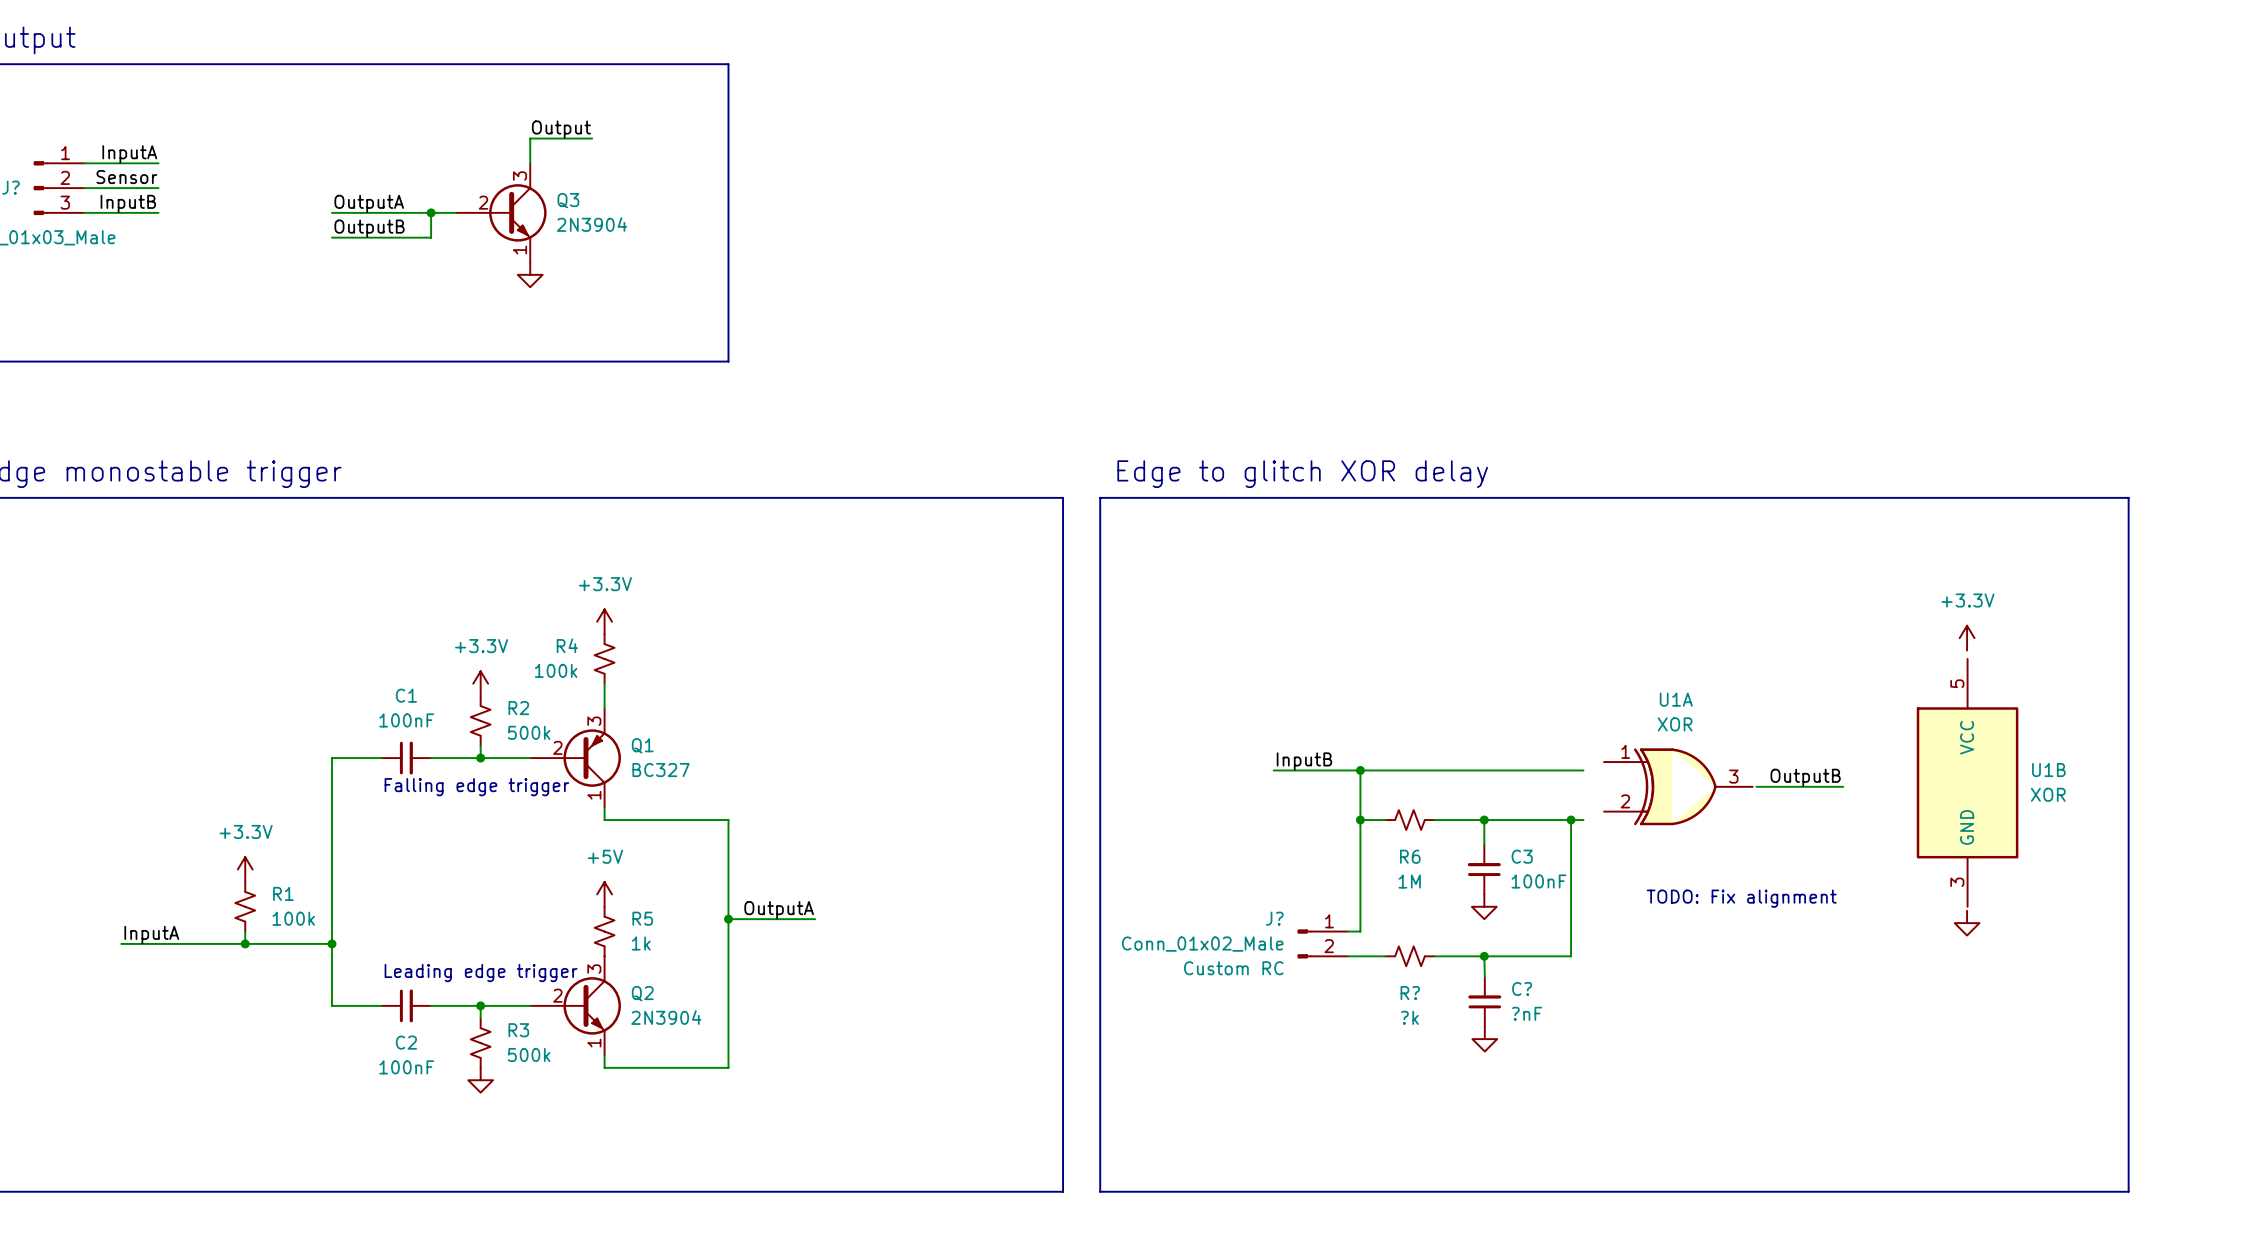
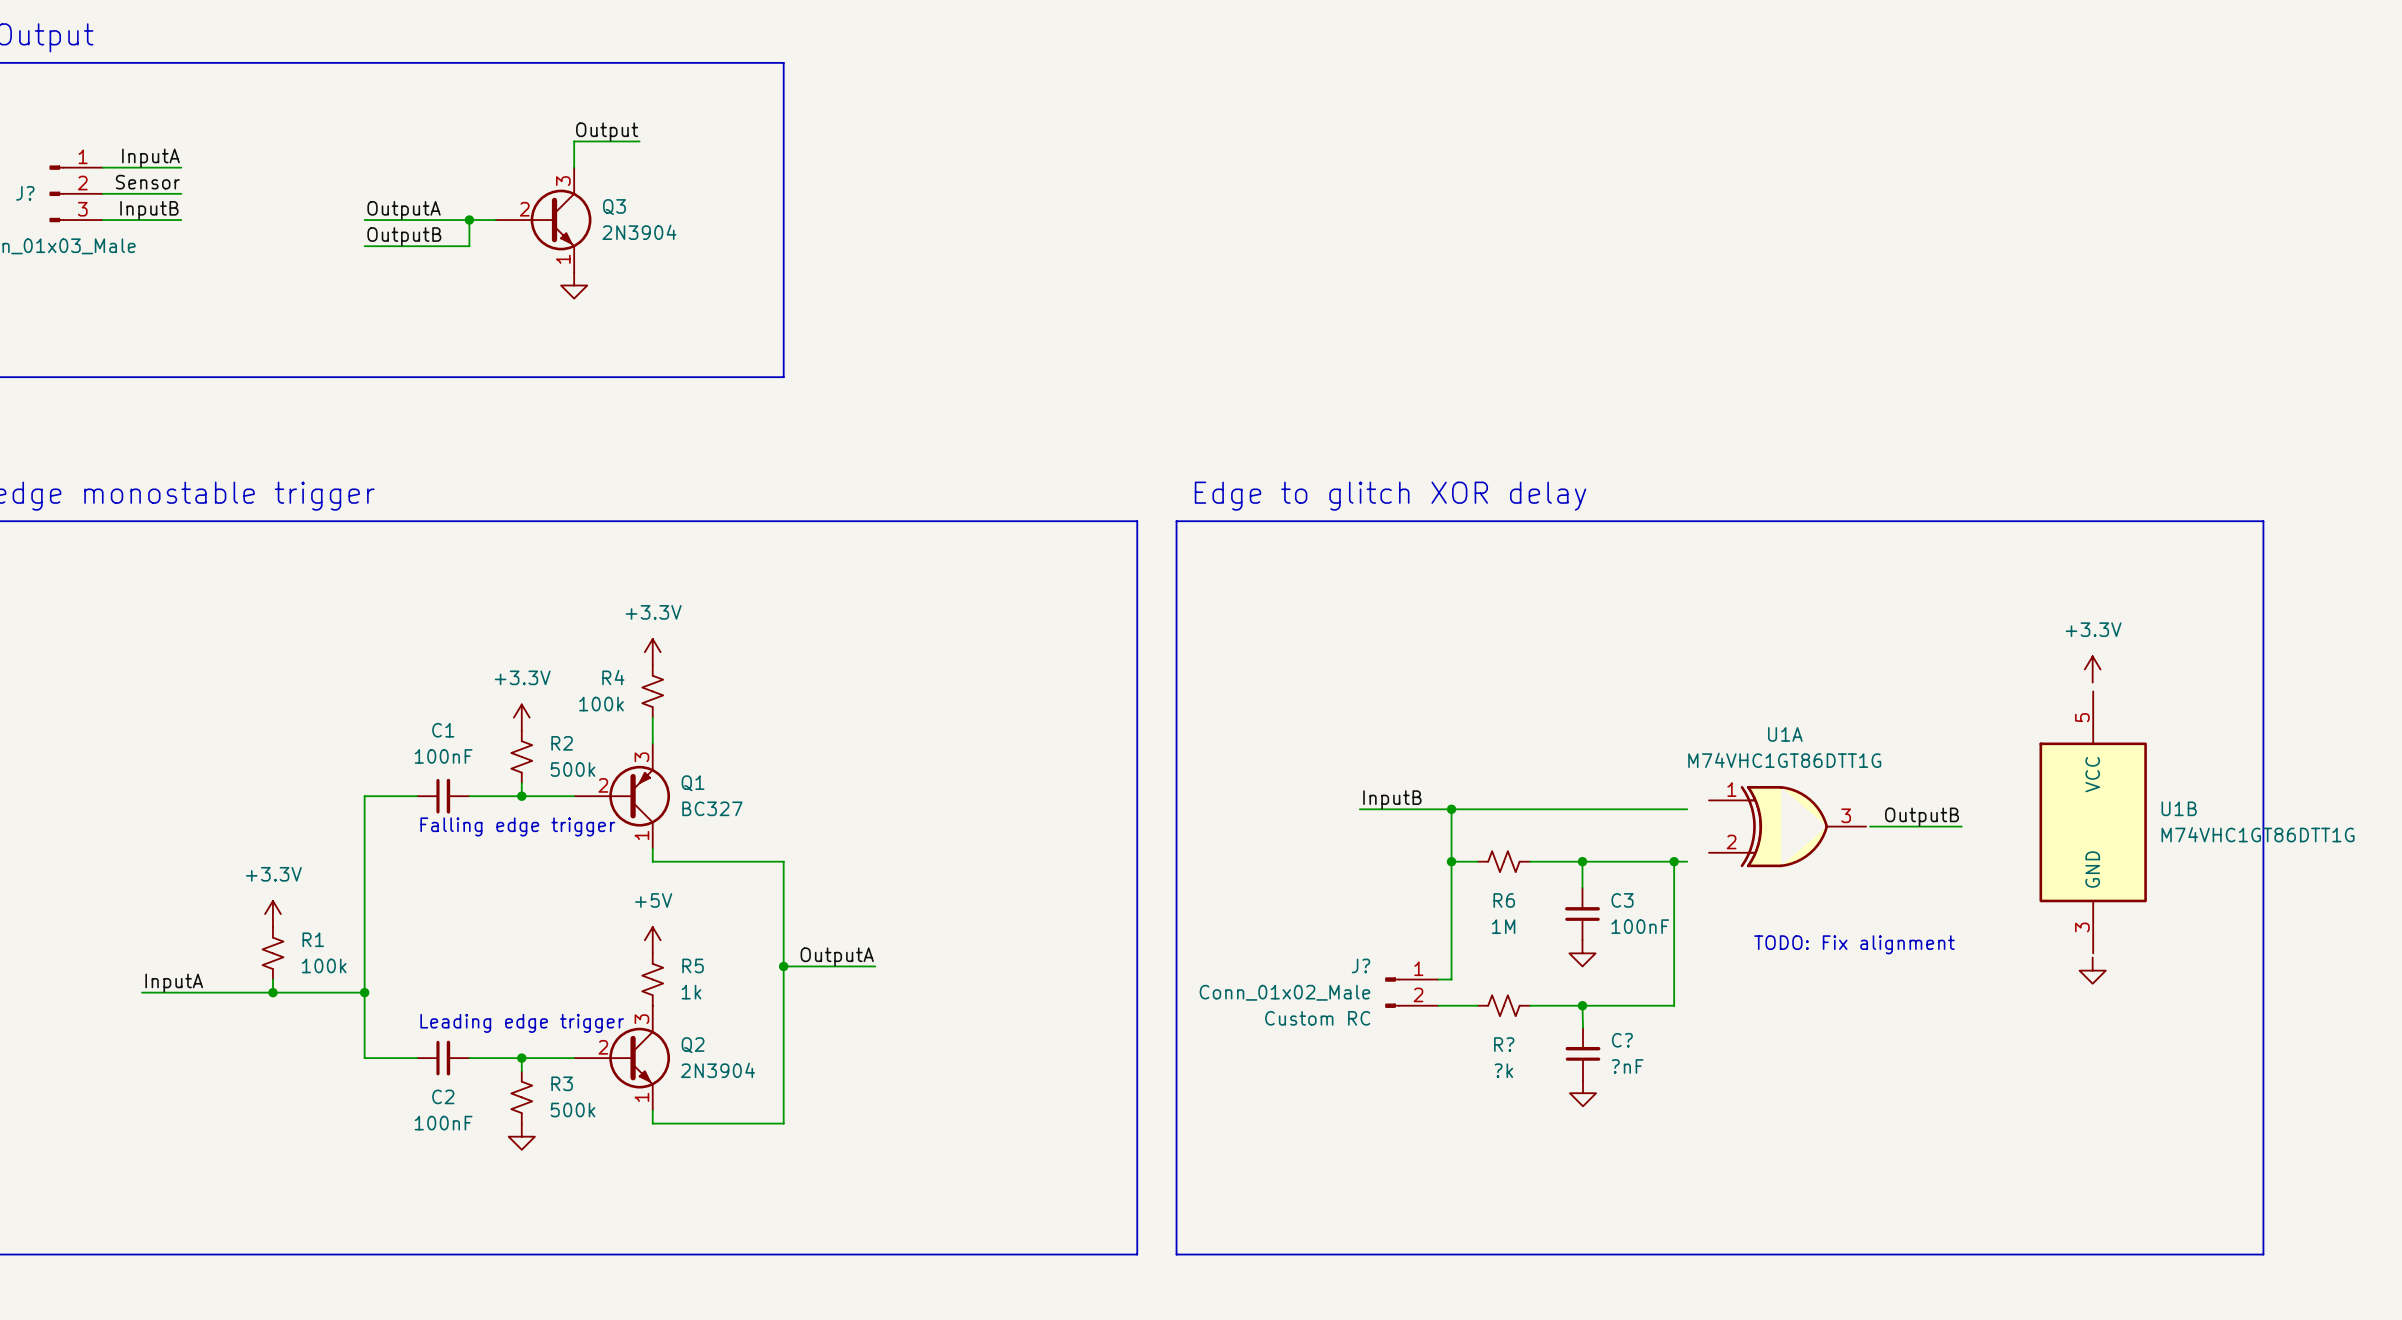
U1A value: XOR (1675, 724) -> M74VHC1GT86DTT1G (1784, 760)
U1B value: XOR (2048, 794) -> M74VHC1GT86DTT1G (2258, 834)

